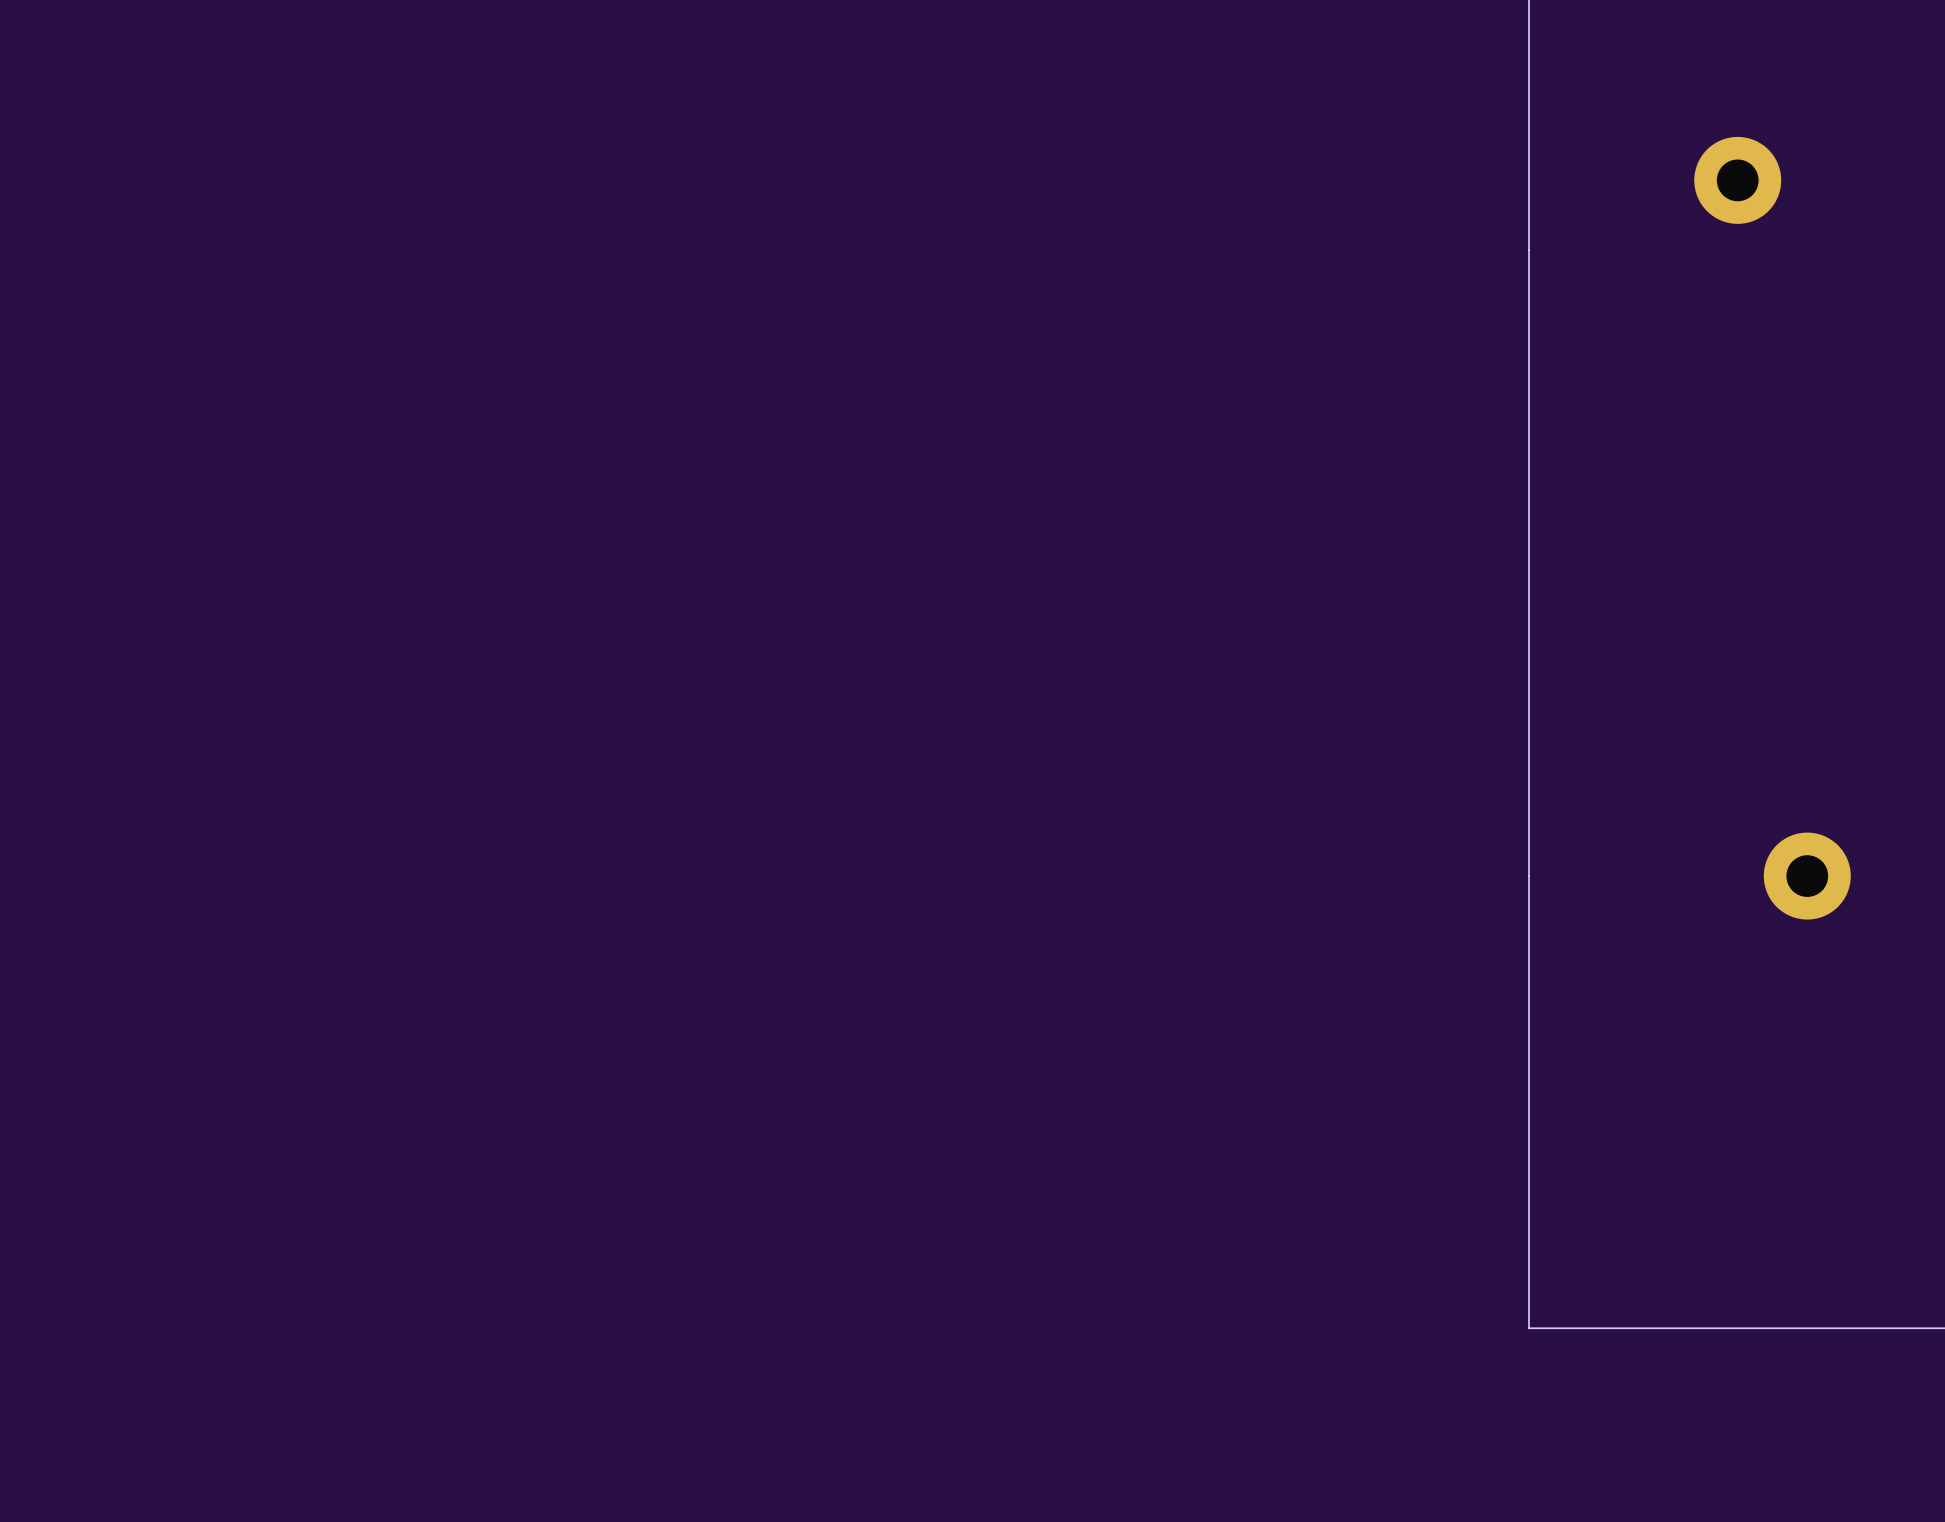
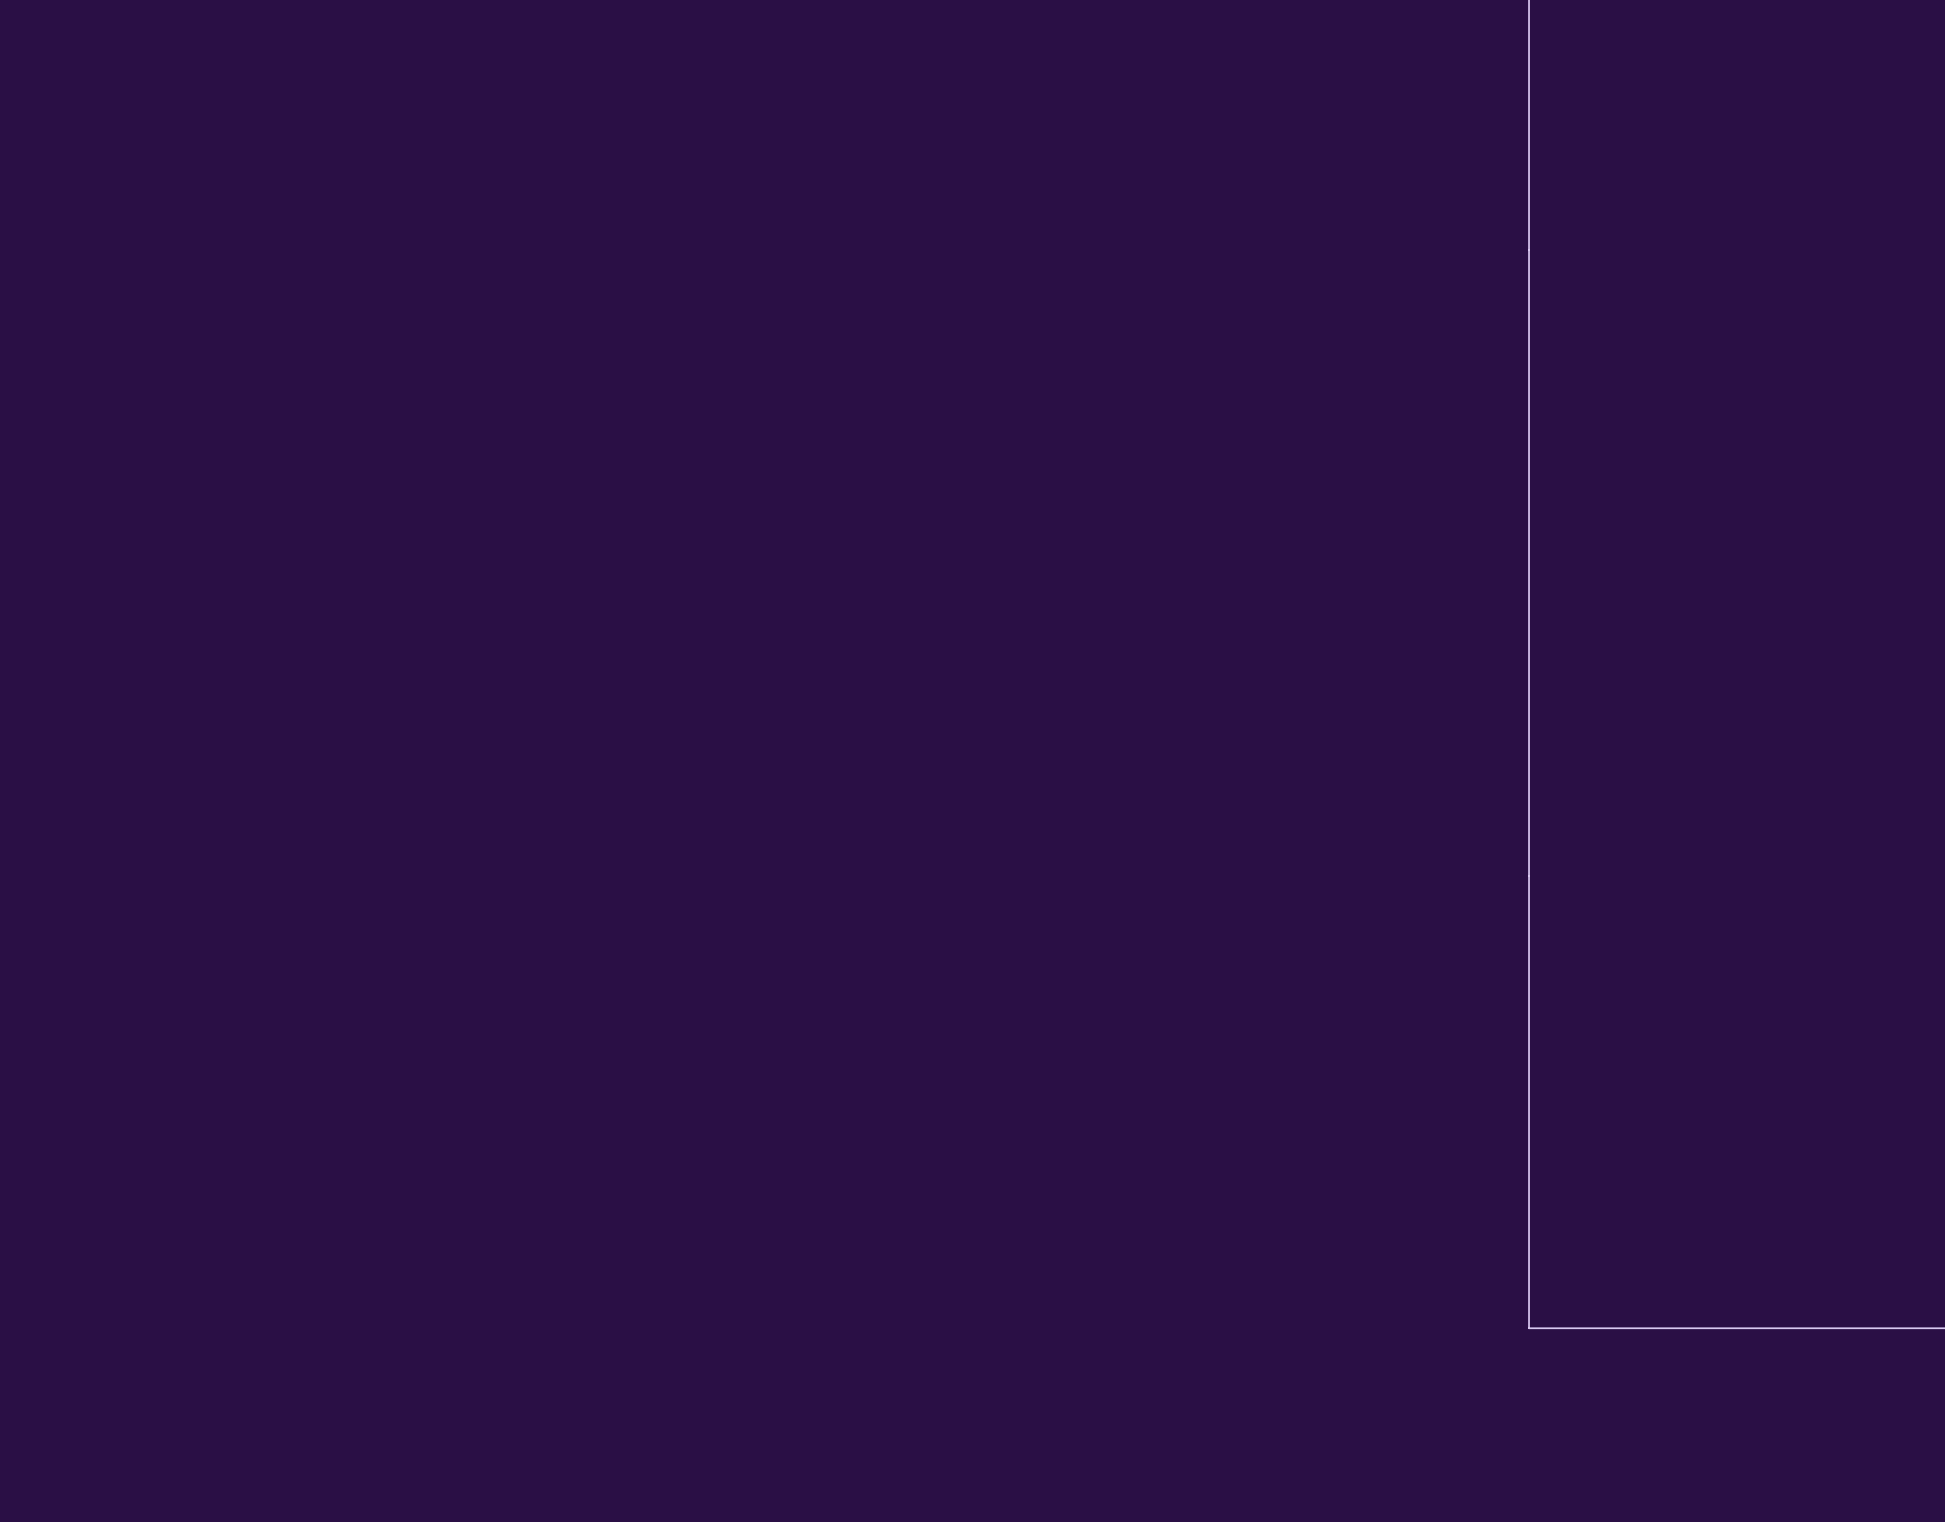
part: (1737, 180) -> none
part: (1807, 876) -> none

